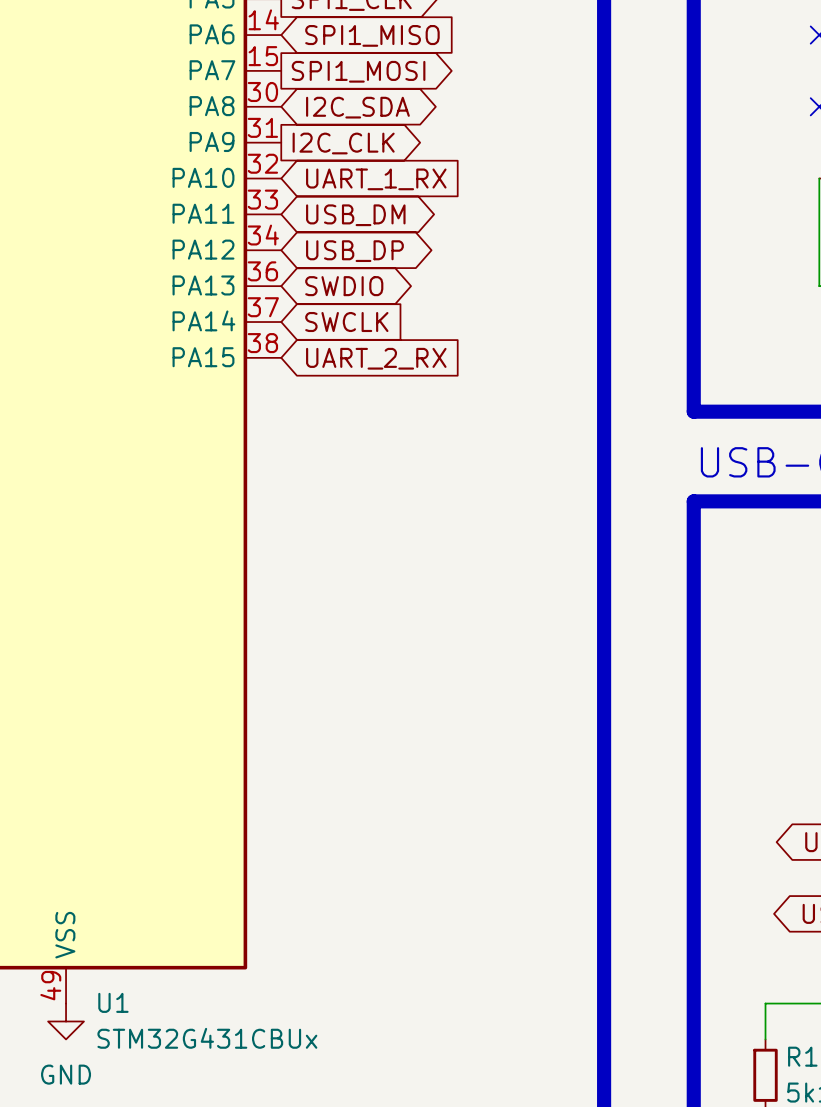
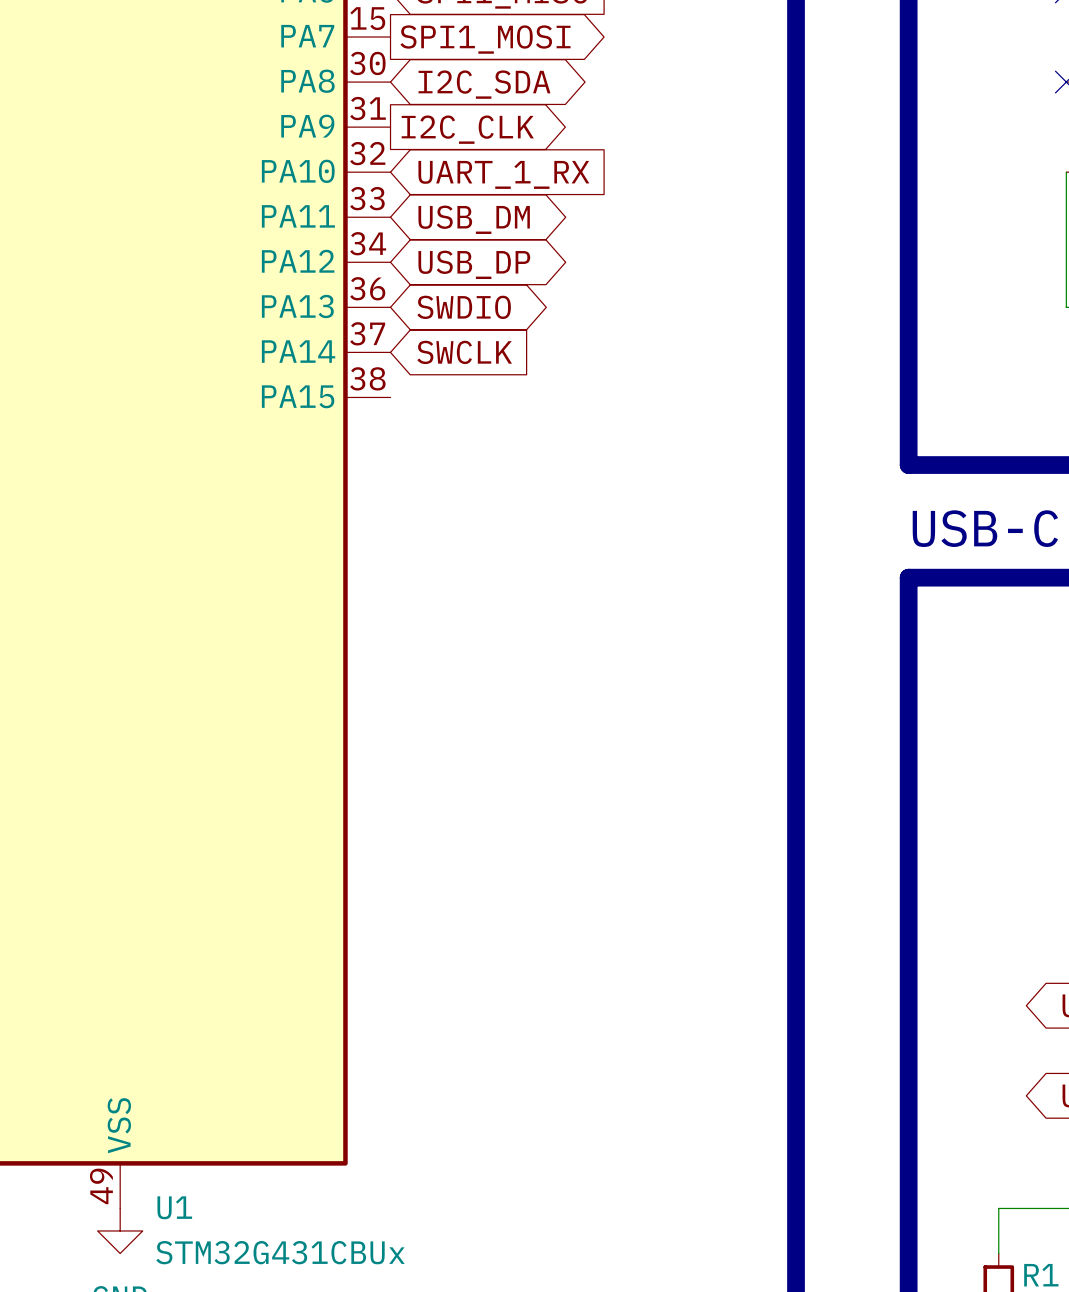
global label: UART_2_RX (376, 358) -> none

